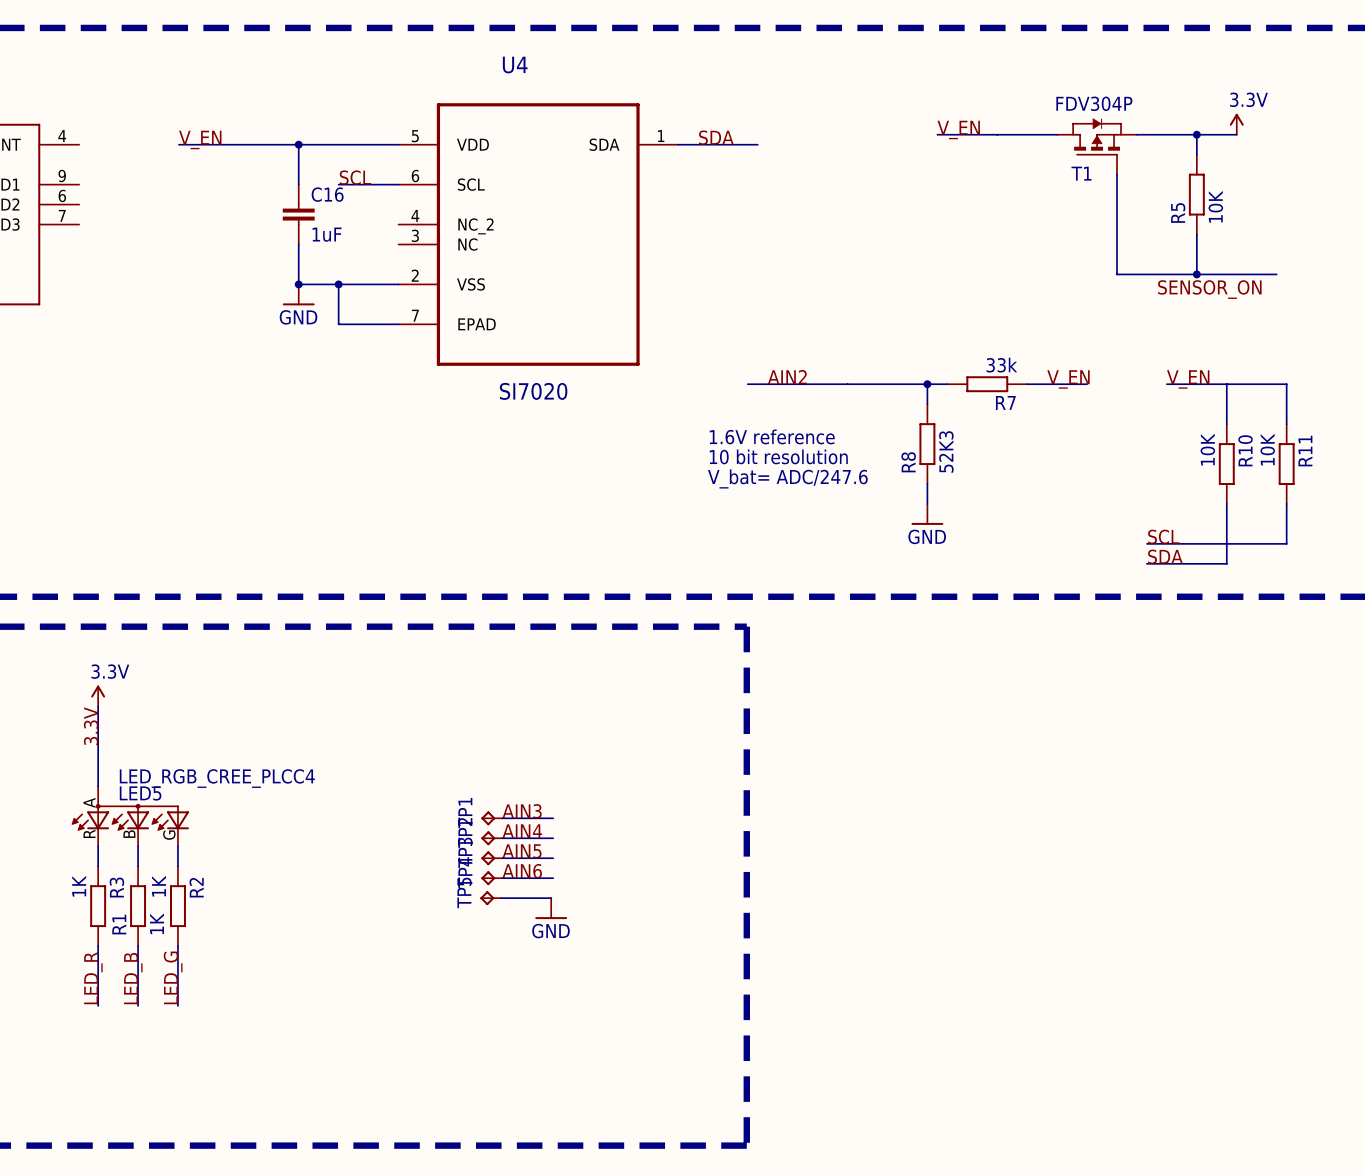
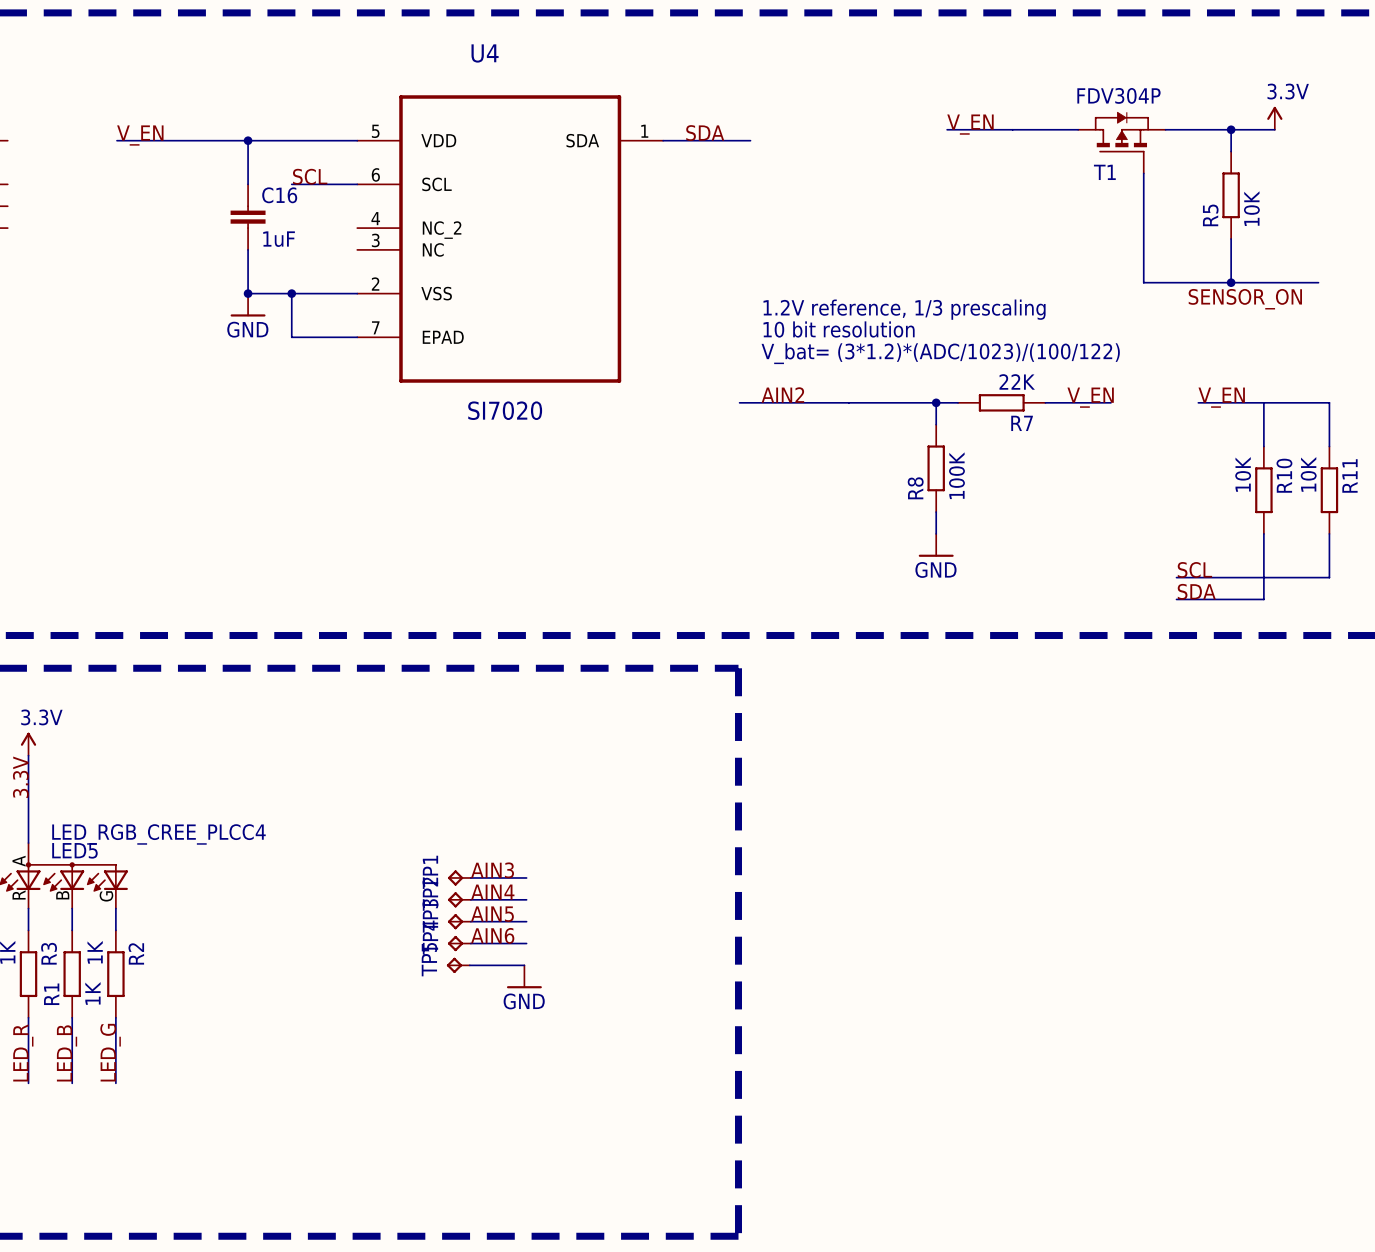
text: none -> 1.2V reference, 1/3 prescaling (904, 309)
text: none -> V_bat= (3*1.2)*(ADC/1023)/(100/122) (940, 353)
R7 value: 33k (1001, 365) -> 22K (1017, 381)
text: 1.6V reference (772, 436) -> none
R8 value: 52K3 (946, 451) -> 100K (956, 475)
text position: 10 bit resolution (778, 456) -> 10 bit resolution (839, 329)
text: V_bat= ADC/247.6 (787, 478) -> none

